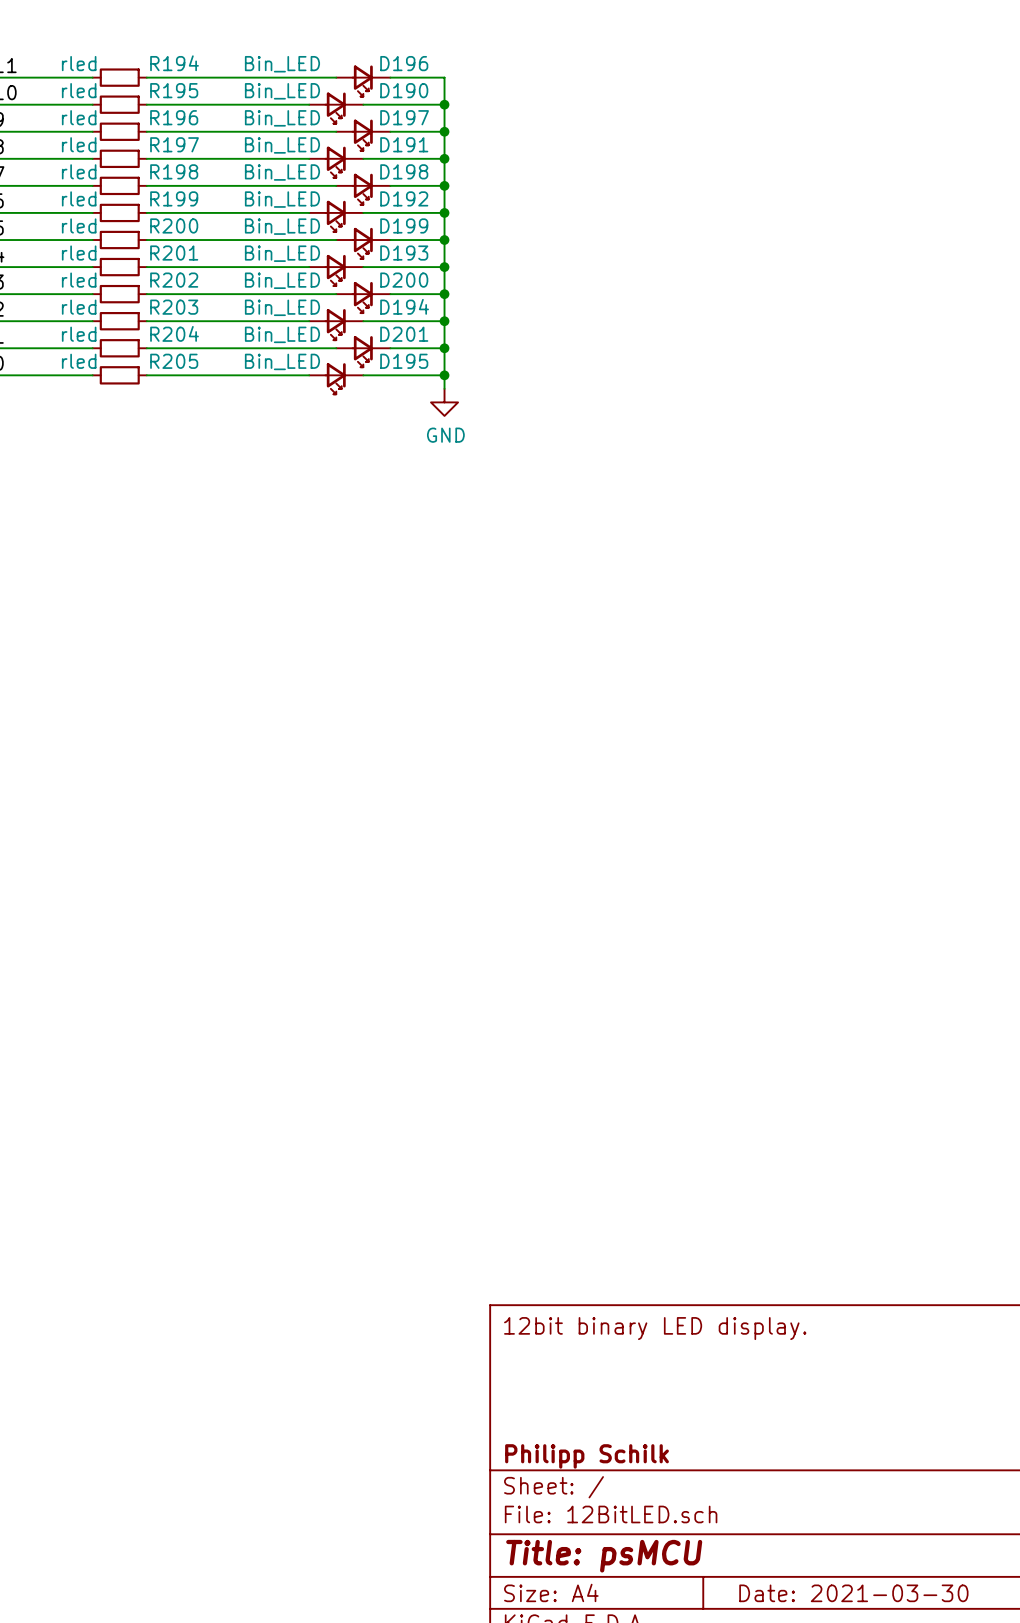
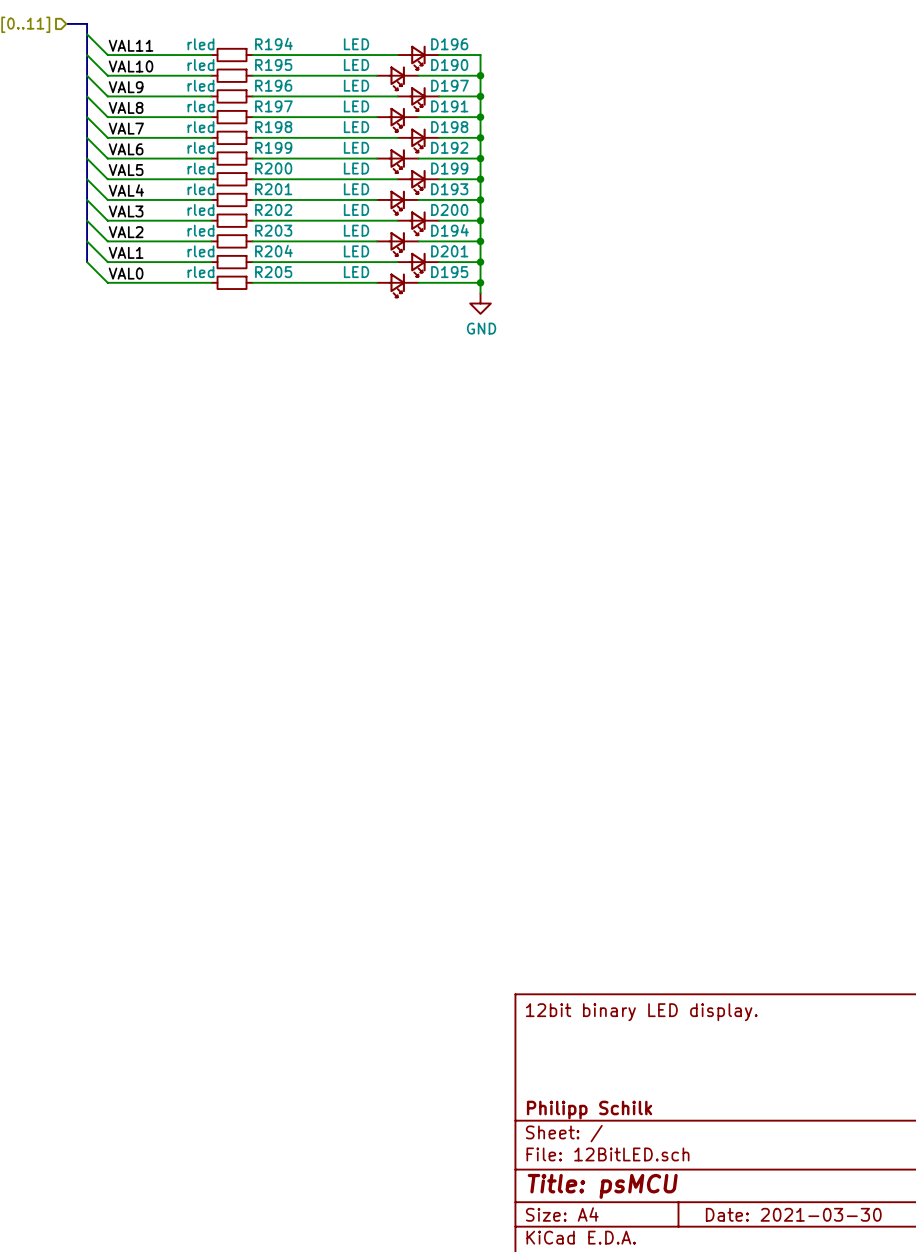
D196 value: Bin_LED (282, 64) -> LED (356, 44)
D190 value: Bin_LED (282, 91) -> LED (356, 64)
D197 value: Bin_LED (282, 118) -> LED (356, 85)
D191 value: Bin_LED (282, 145) -> LED (356, 106)
D198 value: Bin_LED (282, 172) -> LED (356, 127)
D192 value: Bin_LED (282, 199) -> LED (356, 147)
D199 value: Bin_LED (282, 226) -> LED (356, 168)
D193 value: Bin_LED (282, 253) -> LED (356, 189)
D200 value: Bin_LED (282, 280) -> LED (356, 209)
D194 value: Bin_LED (282, 307) -> LED (356, 230)
D201 value: Bin_LED (282, 334) -> LED (356, 251)
D195 value: Bin_LED (282, 361) -> LED (356, 272)

